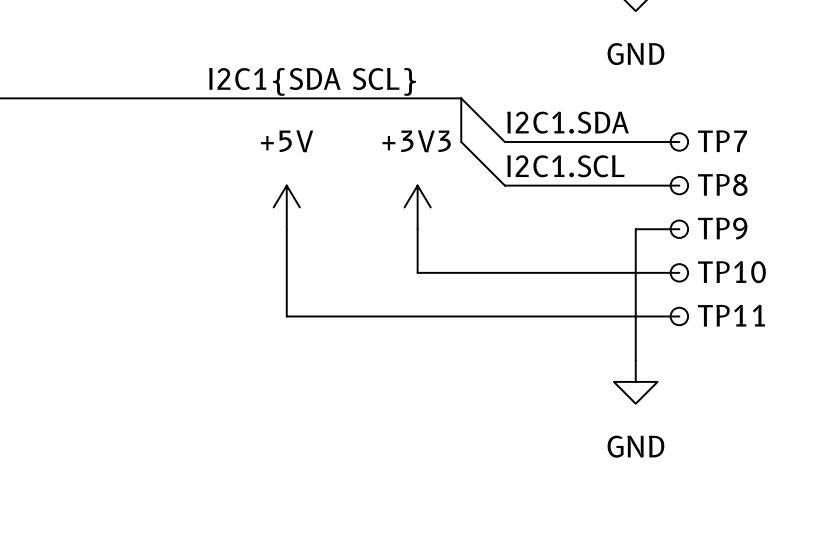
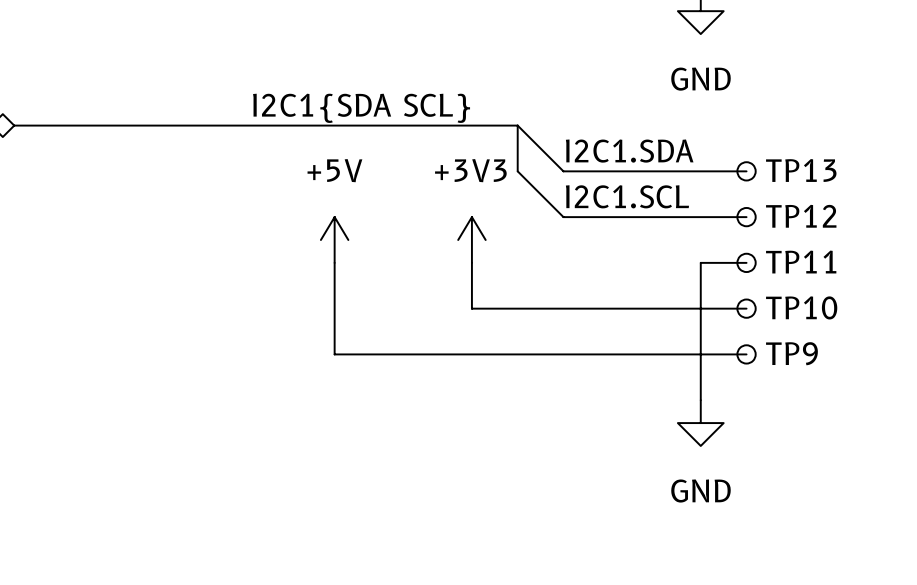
TP7 name: TP7 (722, 141) -> TP13 (801, 170)
TP8 name: TP8 (722, 184) -> TP12 (801, 216)
TP9 name: TP9 (722, 228) -> TP11 (801, 262)
TP11 name: TP11 (731, 315) -> TP9 (791, 353)

